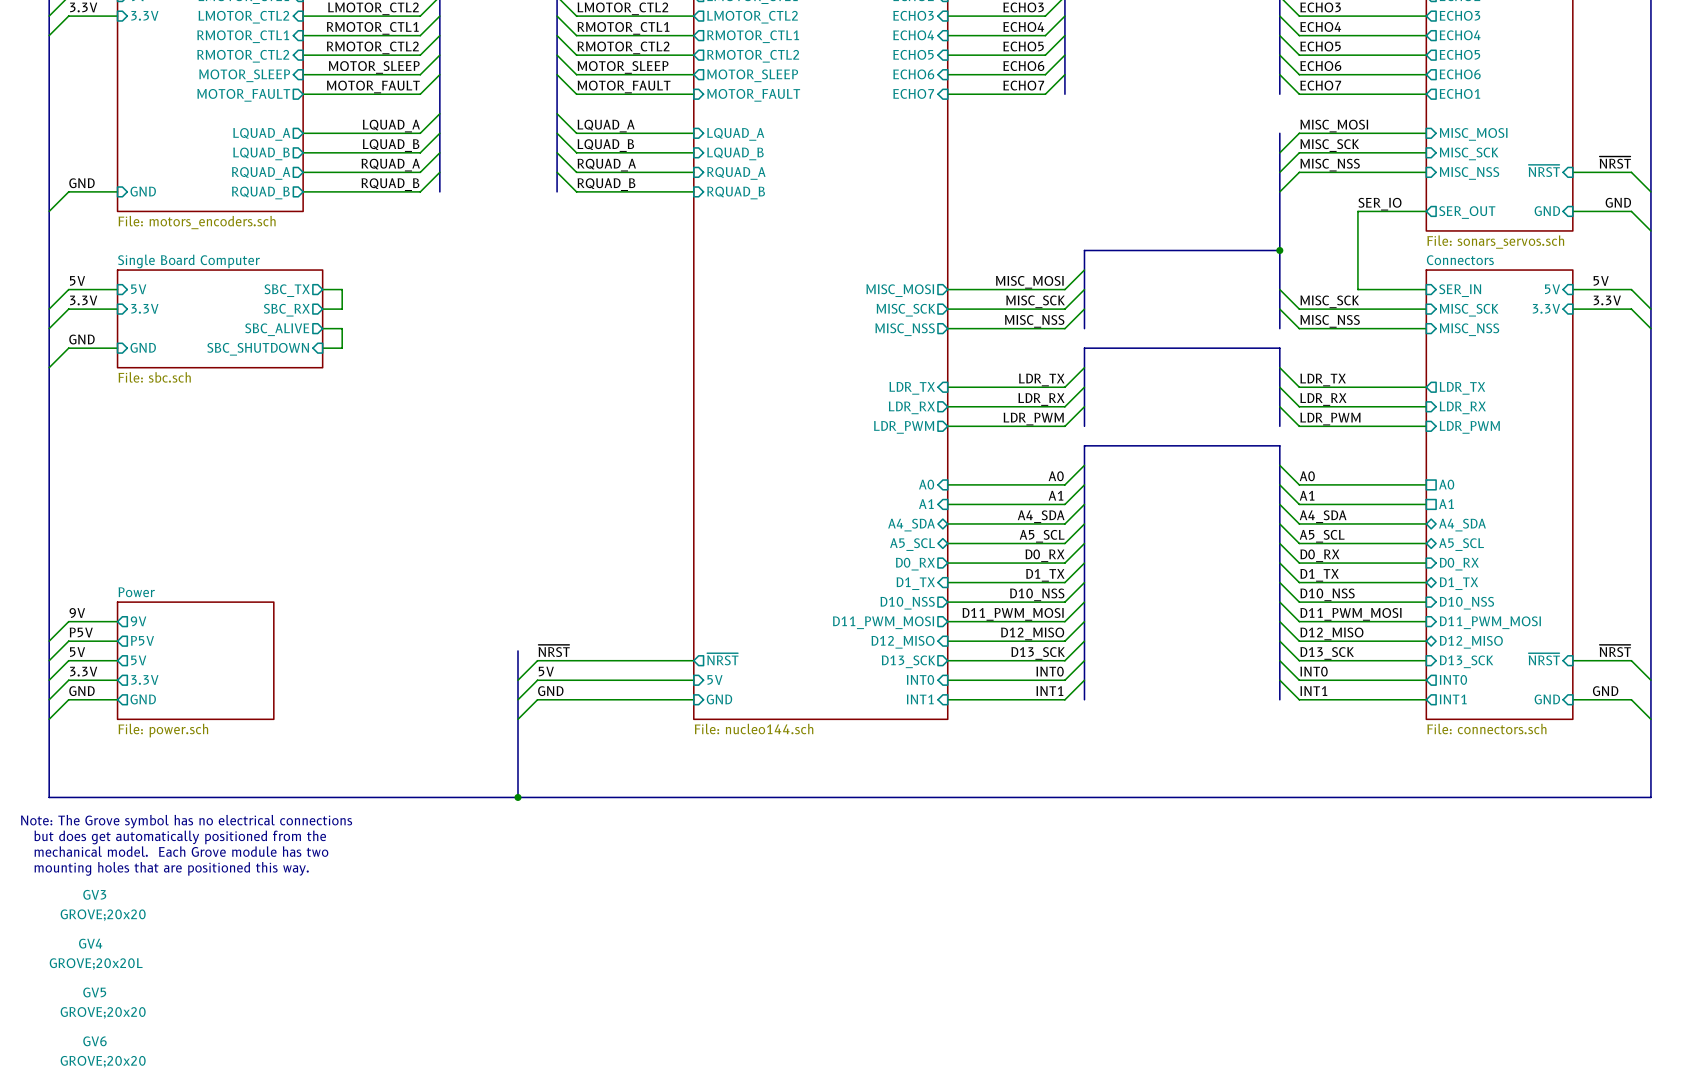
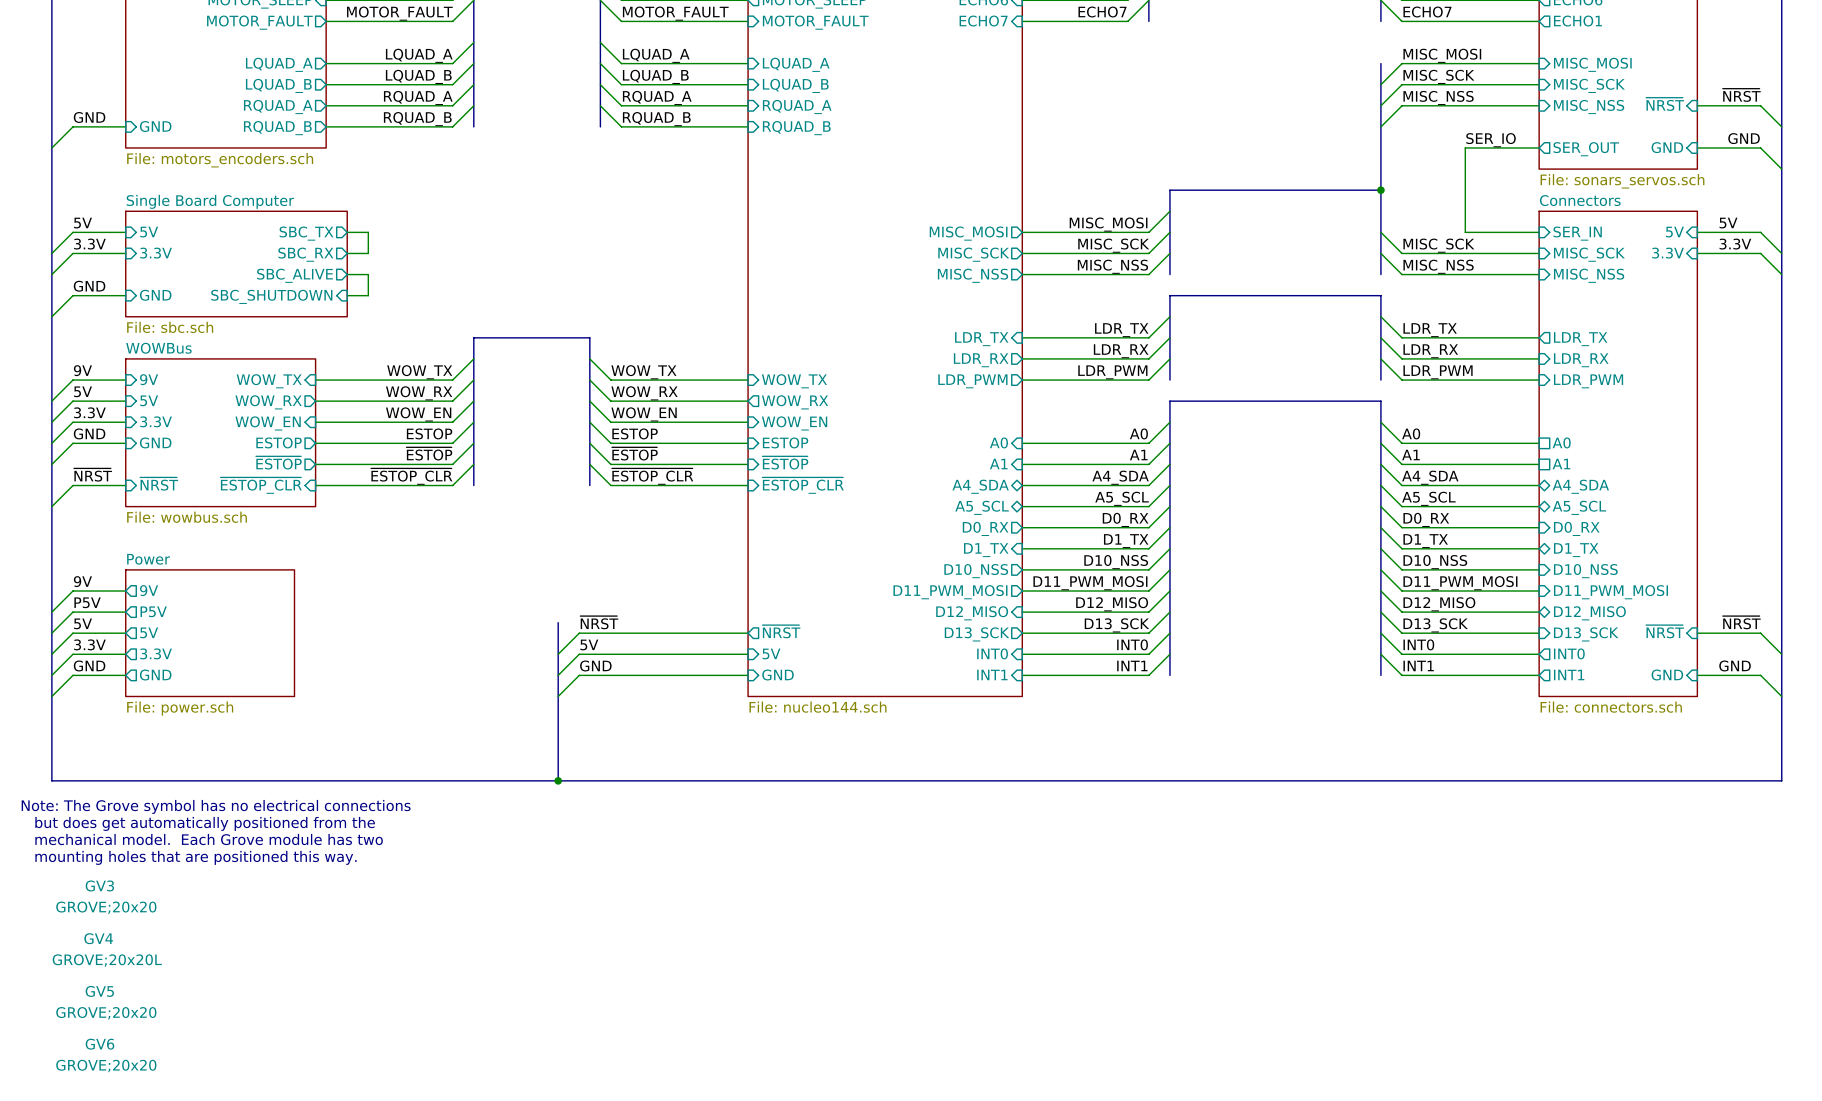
wire: none -> (473, 358) (452, 380) (315, 380)
wire: none -> (589, 358) (610, 380) (748, 380)
label: none -> 9V (82, 370)
label: none -> WOW_TX (419, 372)
label: none -> WOW_TX (643, 372)
wire: none -> (125, 380) (72, 380) (51, 401)
sheet pin: none -> 9V (149, 379)
wire: none -> (473, 380) (452, 401) (315, 401)
wire: none -> (589, 380) (610, 401) (748, 401)
sheet pin: none -> WOW_TX (269, 381)
sheet pin: none -> WOW_TX (794, 381)
label: none -> 5V (83, 391)
label: none -> WOW_RX (419, 393)
label: none -> WOW_RX (644, 393)
wire: none -> (125, 401) (72, 401) (51, 422)
sheet pin: none -> 5V (149, 400)
wire: none -> (473, 401) (452, 422) (315, 422)
wire: none -> (589, 401) (610, 422) (748, 422)
sheet pin: none -> WOW_RX (268, 402)
sheet pin: none -> WOW_RX (795, 402)
label: none -> 3.3V (89, 412)
label: none -> WOW_EN (418, 414)
label: none -> WOW_EN (644, 414)
wire: none -> (125, 422) (72, 422) (51, 443)
sheet pin: none -> 3.3V (156, 421)
wire: none -> (473, 422) (452, 443) (315, 443)
wire: none -> (589, 422) (610, 443) (748, 443)
sheet pin: none -> WOW_EN (268, 423)
sheet pin: none -> WOW_EN (794, 423)
sheet WOWBus: none -> File: wowbus.sch (220, 432)
label: none -> GND (89, 433)
label: none -> ESTOP (429, 433)
label: none -> ESTOP (635, 433)
wire: none -> (125, 443) (72, 443) (51, 464)
sheet pin: none -> GND (155, 442)
sheet pin: none -> ESTOP (279, 442)
wire: none -> (473, 443) (452, 464) (315, 464)
wire: none -> (589, 443) (610, 464) (748, 464)
sheet pin: none -> ESTOP (785, 442)
label: none -> ~{ESTOP} (429, 453)
label: none -> ~{ESTOP} (634, 453)
sheet pin: none -> ~{ESTOP} (278, 462)
sheet pin: none -> ~{ESTOP} (785, 462)
wire: none -> (473, 464) (452, 485) (315, 485)
wire: none -> (589, 464) (610, 485) (748, 485)
label: none -> ~{NRST} (92, 475)
label: none -> ~{ESTOP_CLR} (411, 476)
label: none -> ~{ESTOP_CLR} (652, 476)
sheet pin: none -> ~{NRST} (159, 484)
wire: none -> (125, 485) (72, 485) (51, 506)
sheet pin: none -> ~{ESTOP_CLR} (261, 485)
bus: none -> (473, 485) (473, 337) (589, 337) (589, 485)
sheet pin: none -> ~{ESTOP_CLR} (803, 485)

